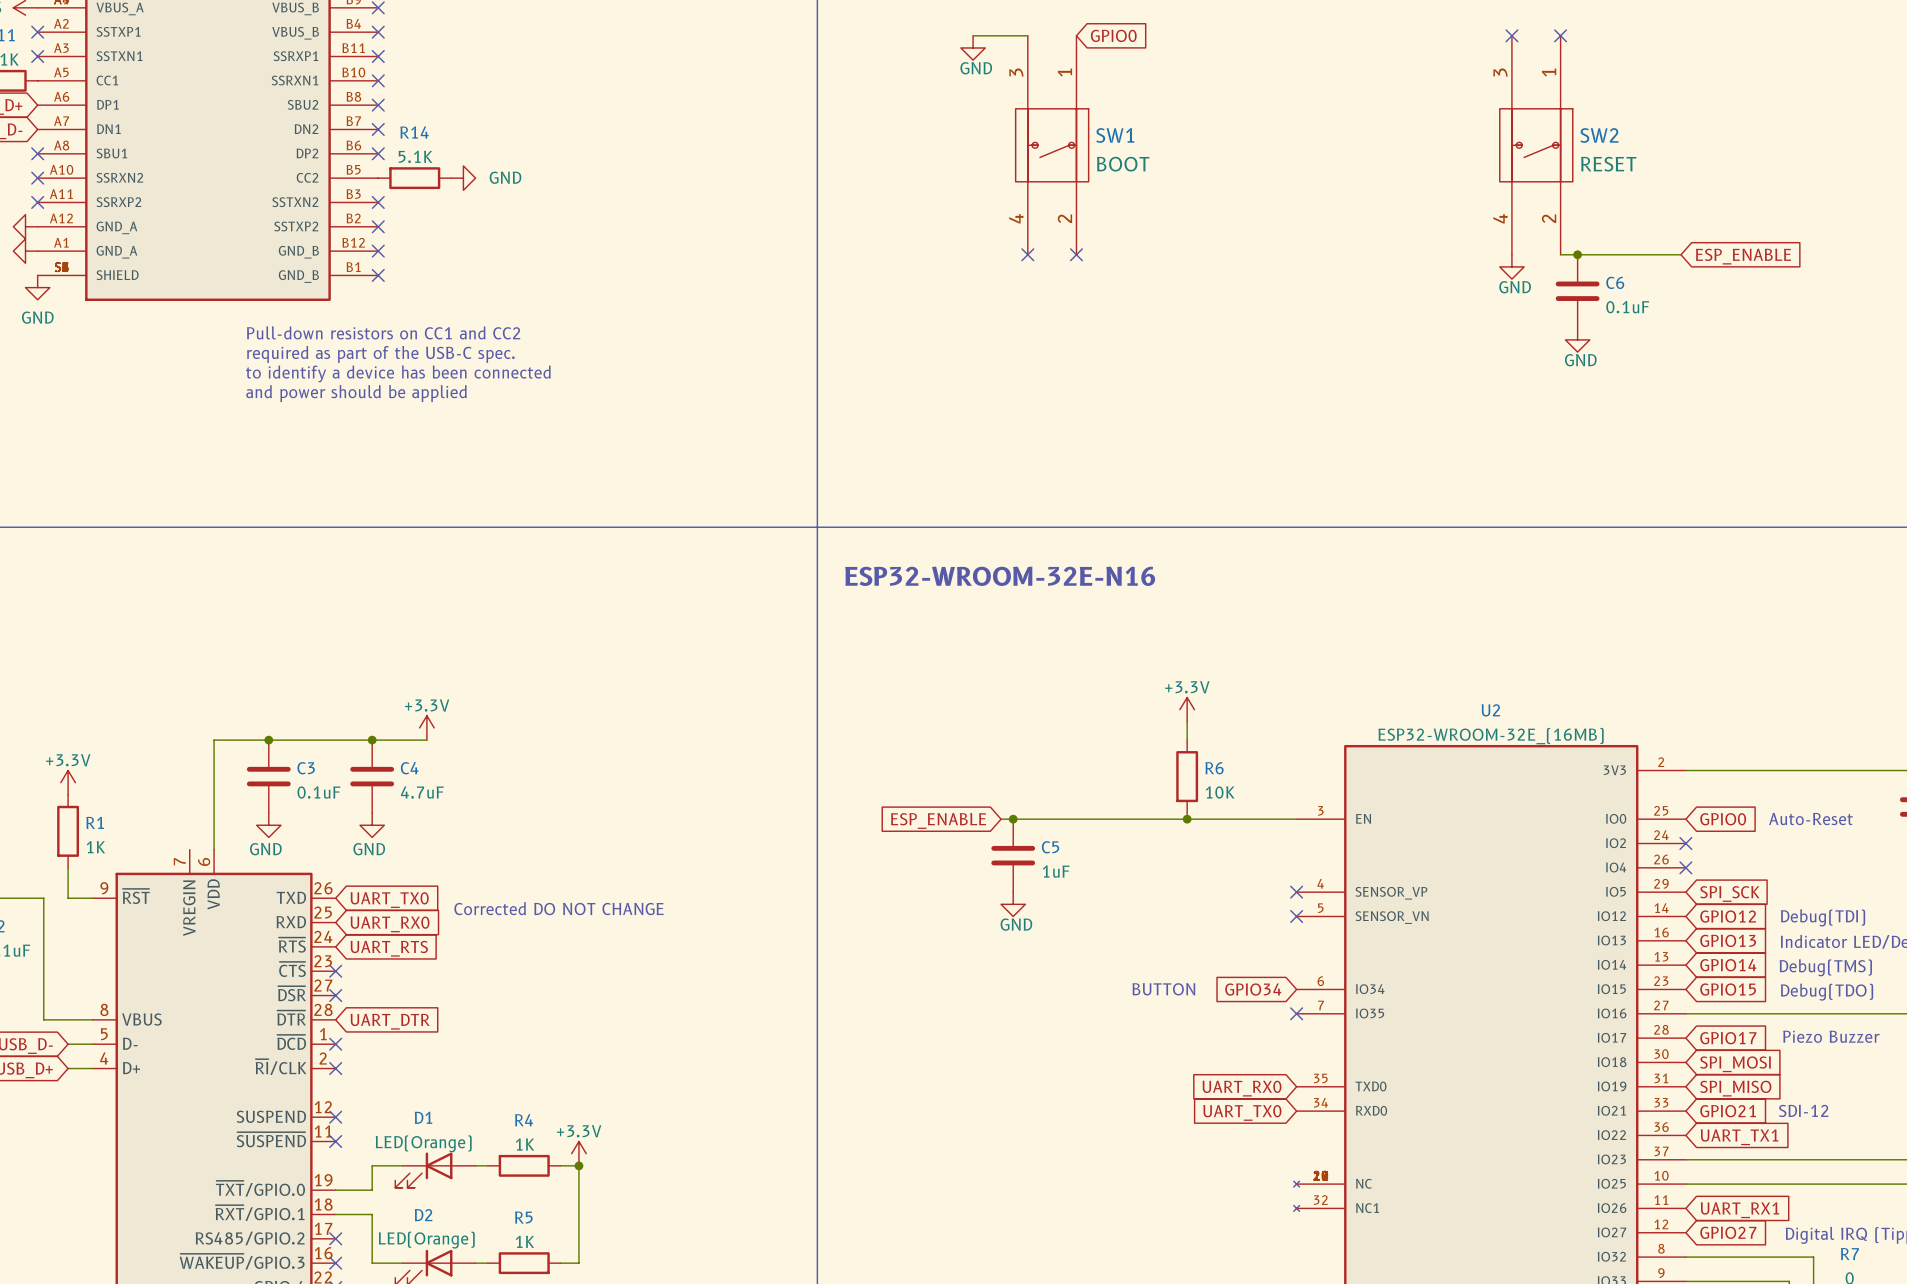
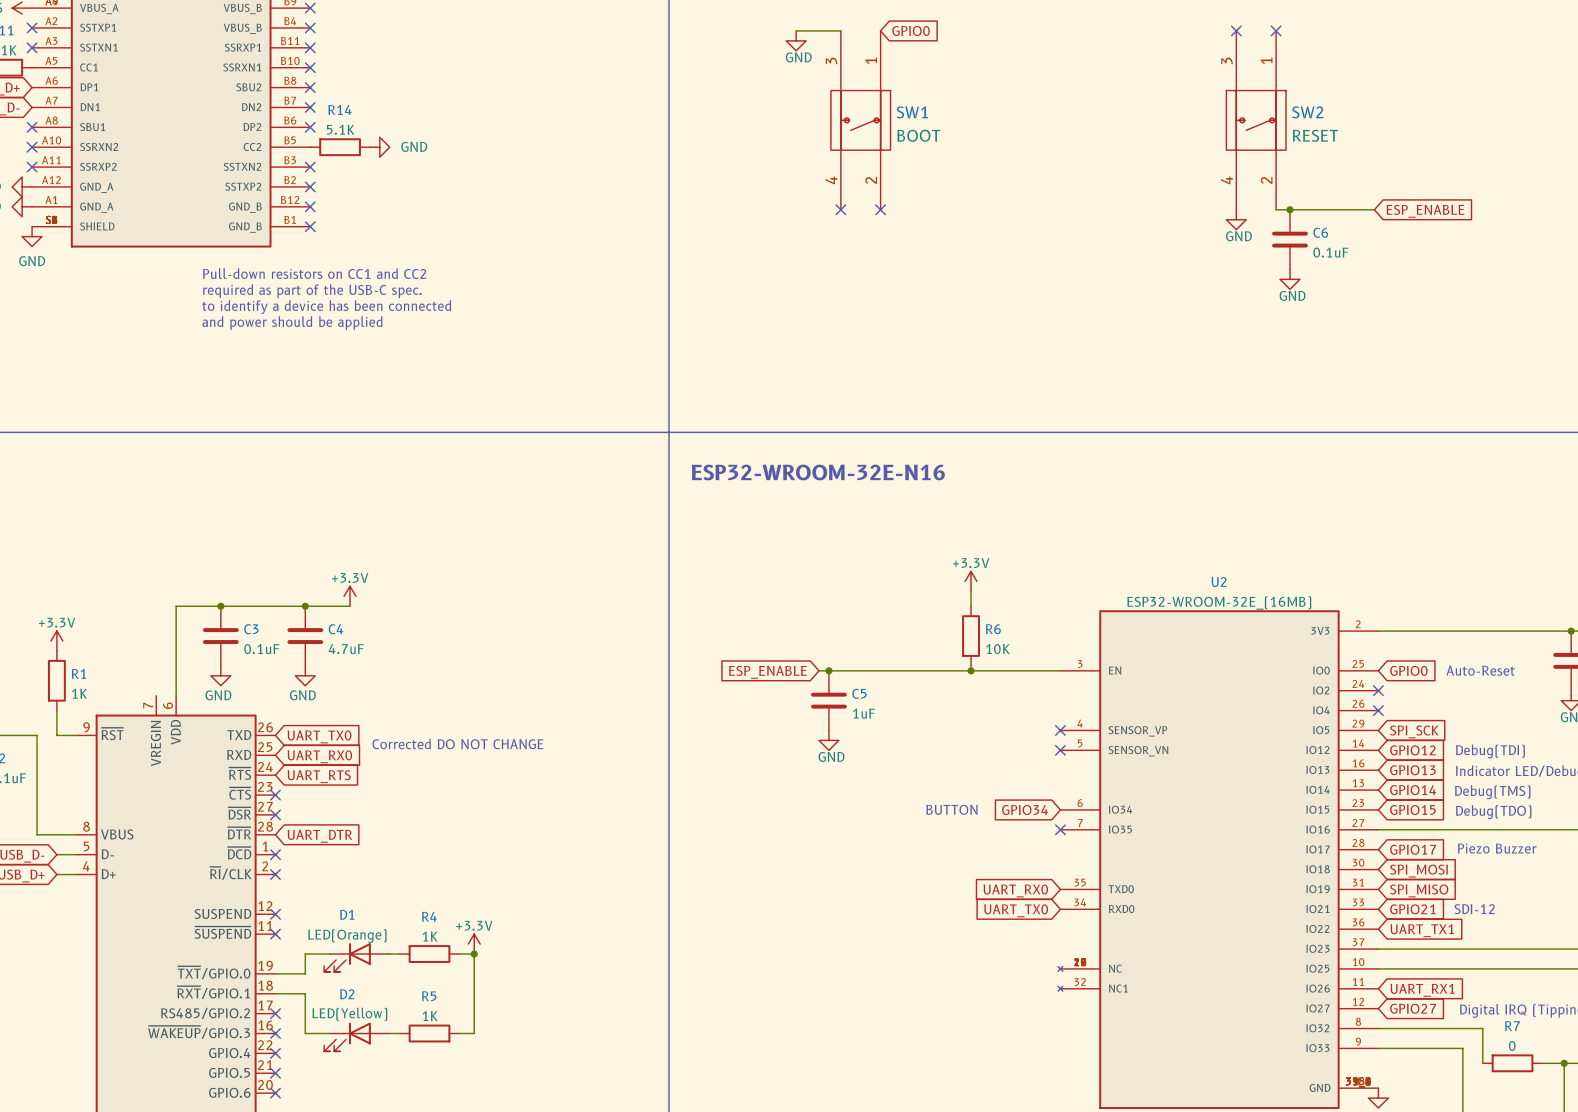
D2 value: LED(Orange) (426, 1240) -> LED(Yellow) (349, 1014)

